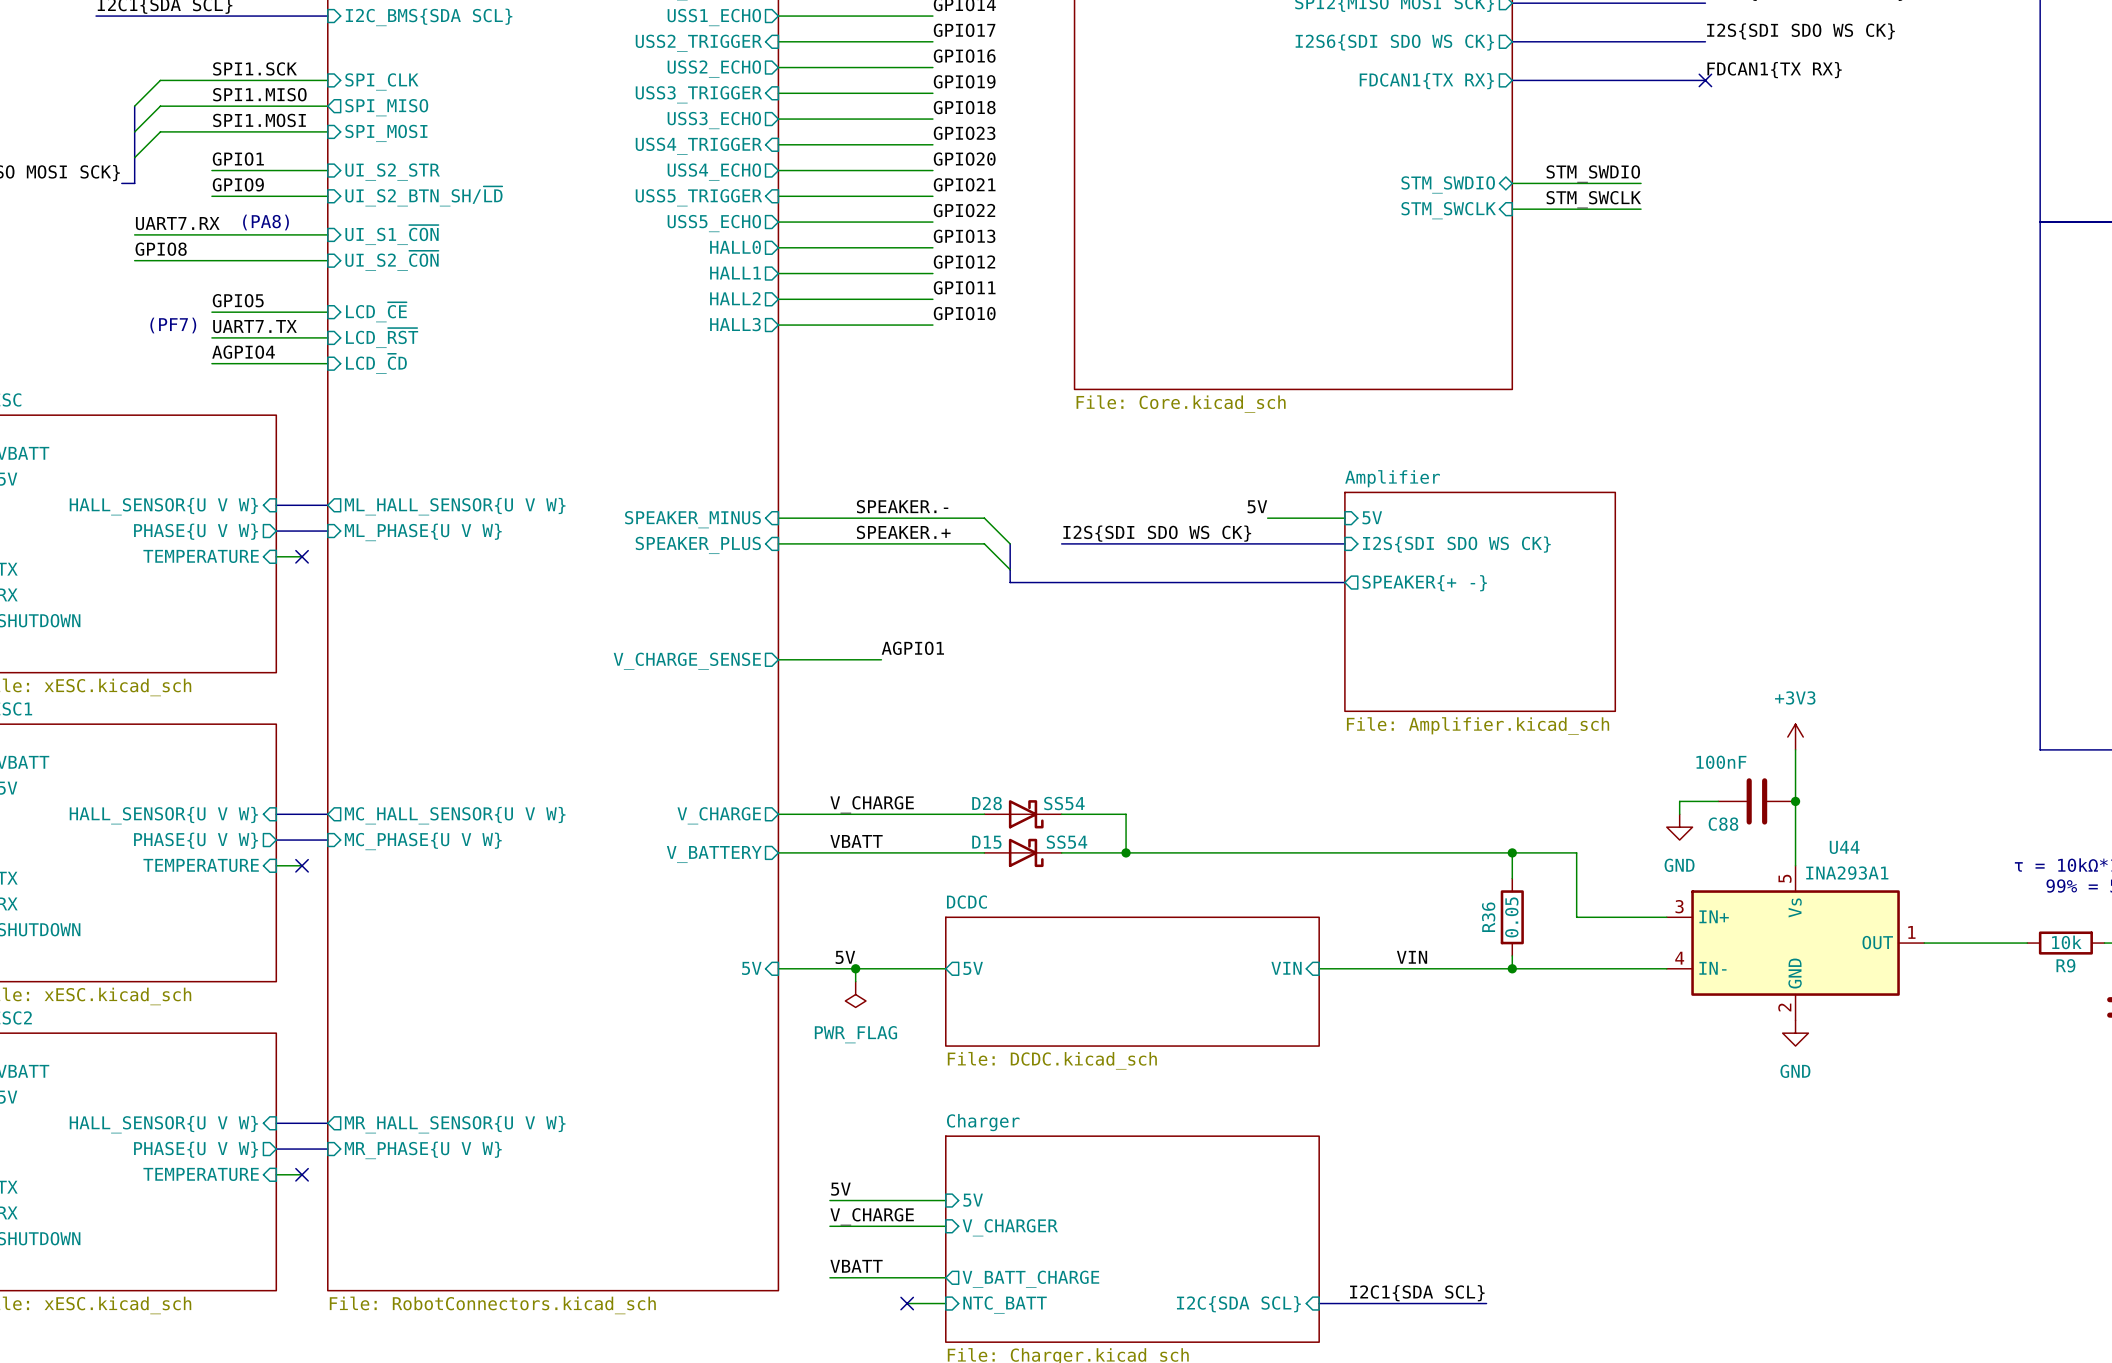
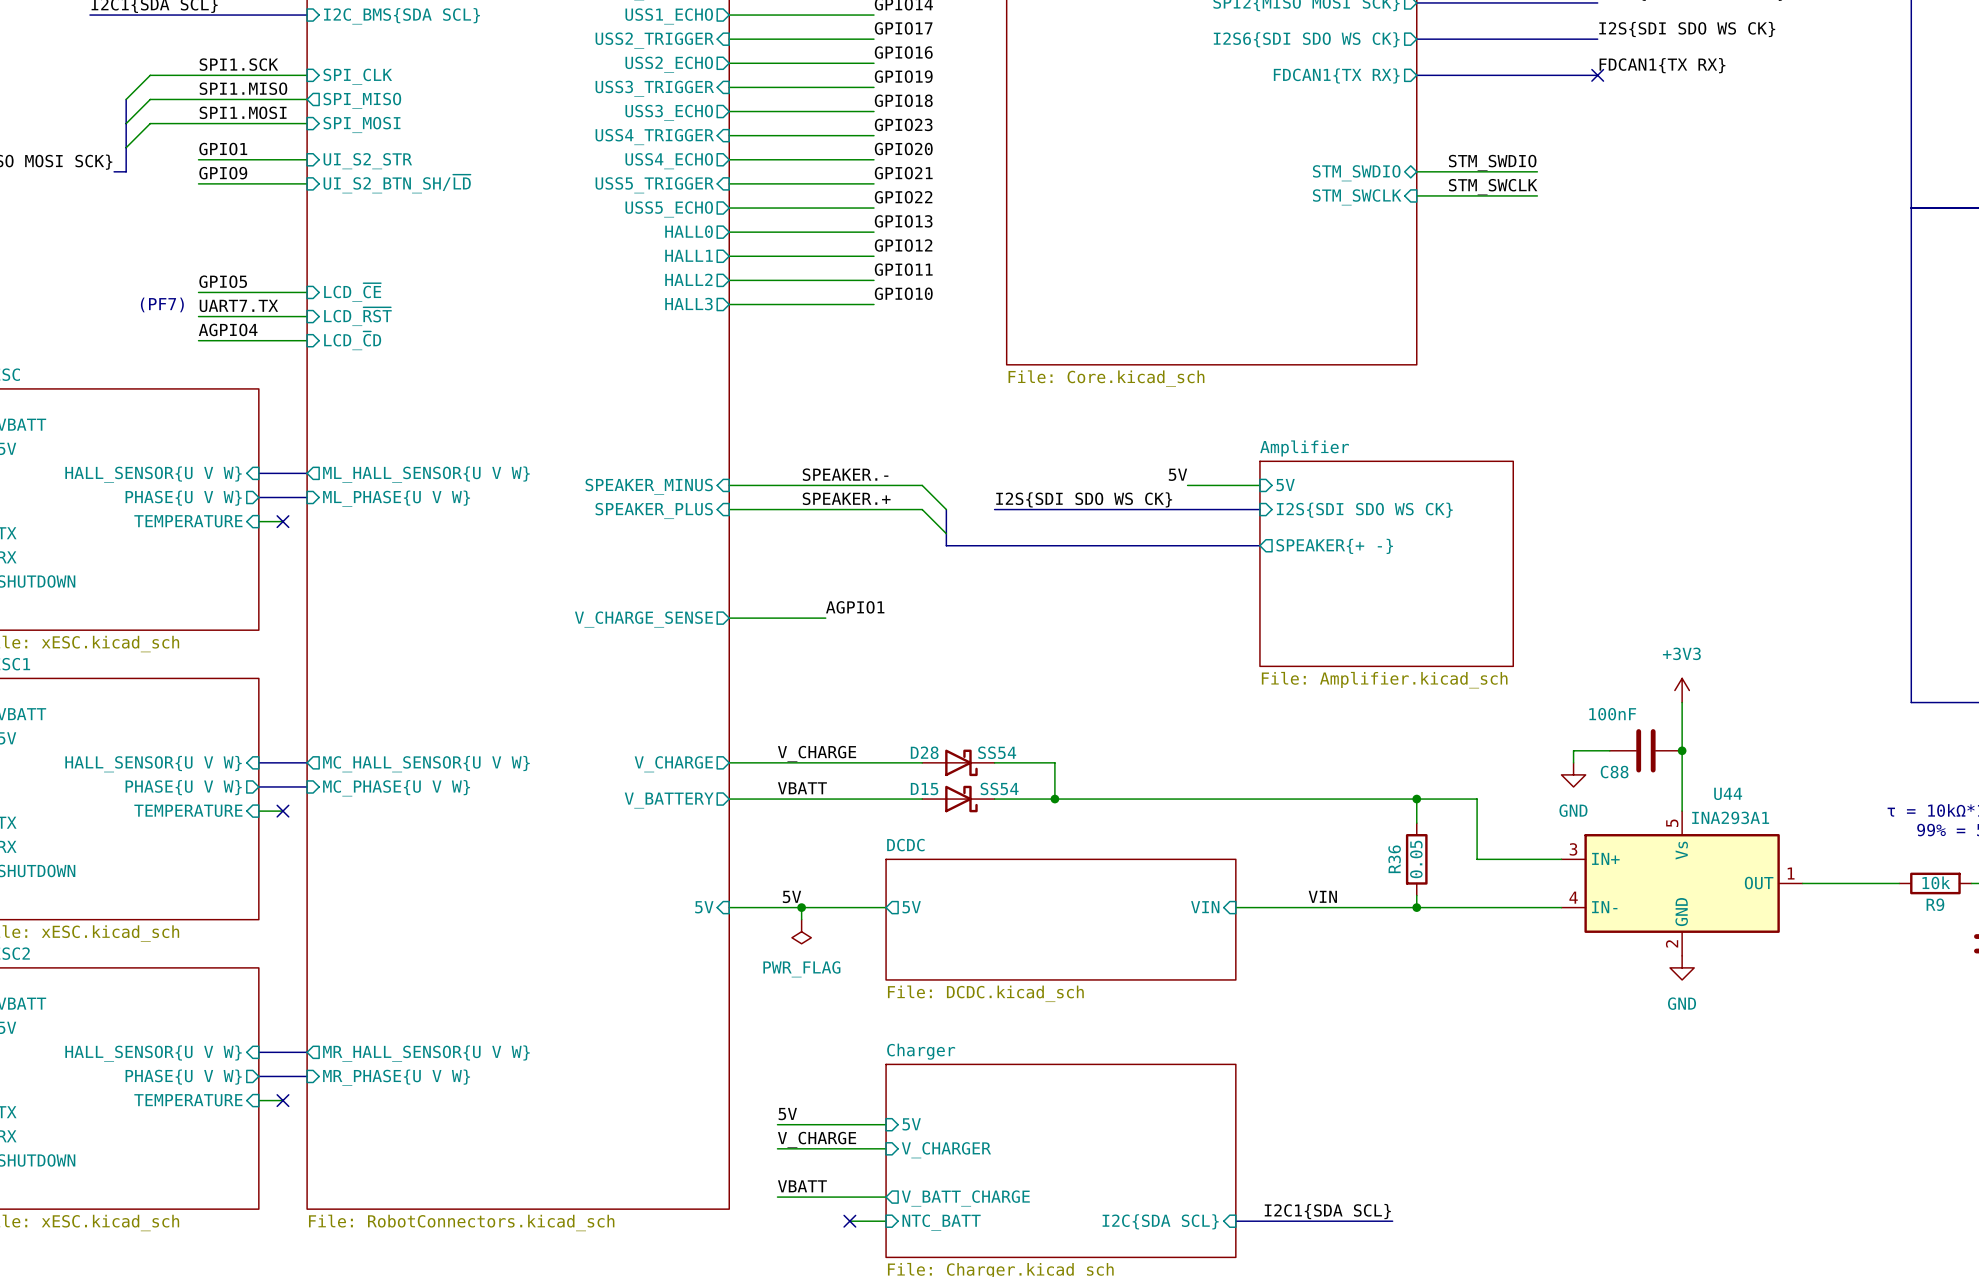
text: (PA8) (266, 222) -> none
label: UART7.RX (177, 223) -> none
wire: (134, 234) (327, 234) -> none
sheet pin: UI_S1_~{CON} (392, 235) -> none
label: GPIO8 (161, 249) -> none
wire: (134, 260) (327, 260) -> none
sheet pin: UI_S2_~{CON} (392, 260) -> none

